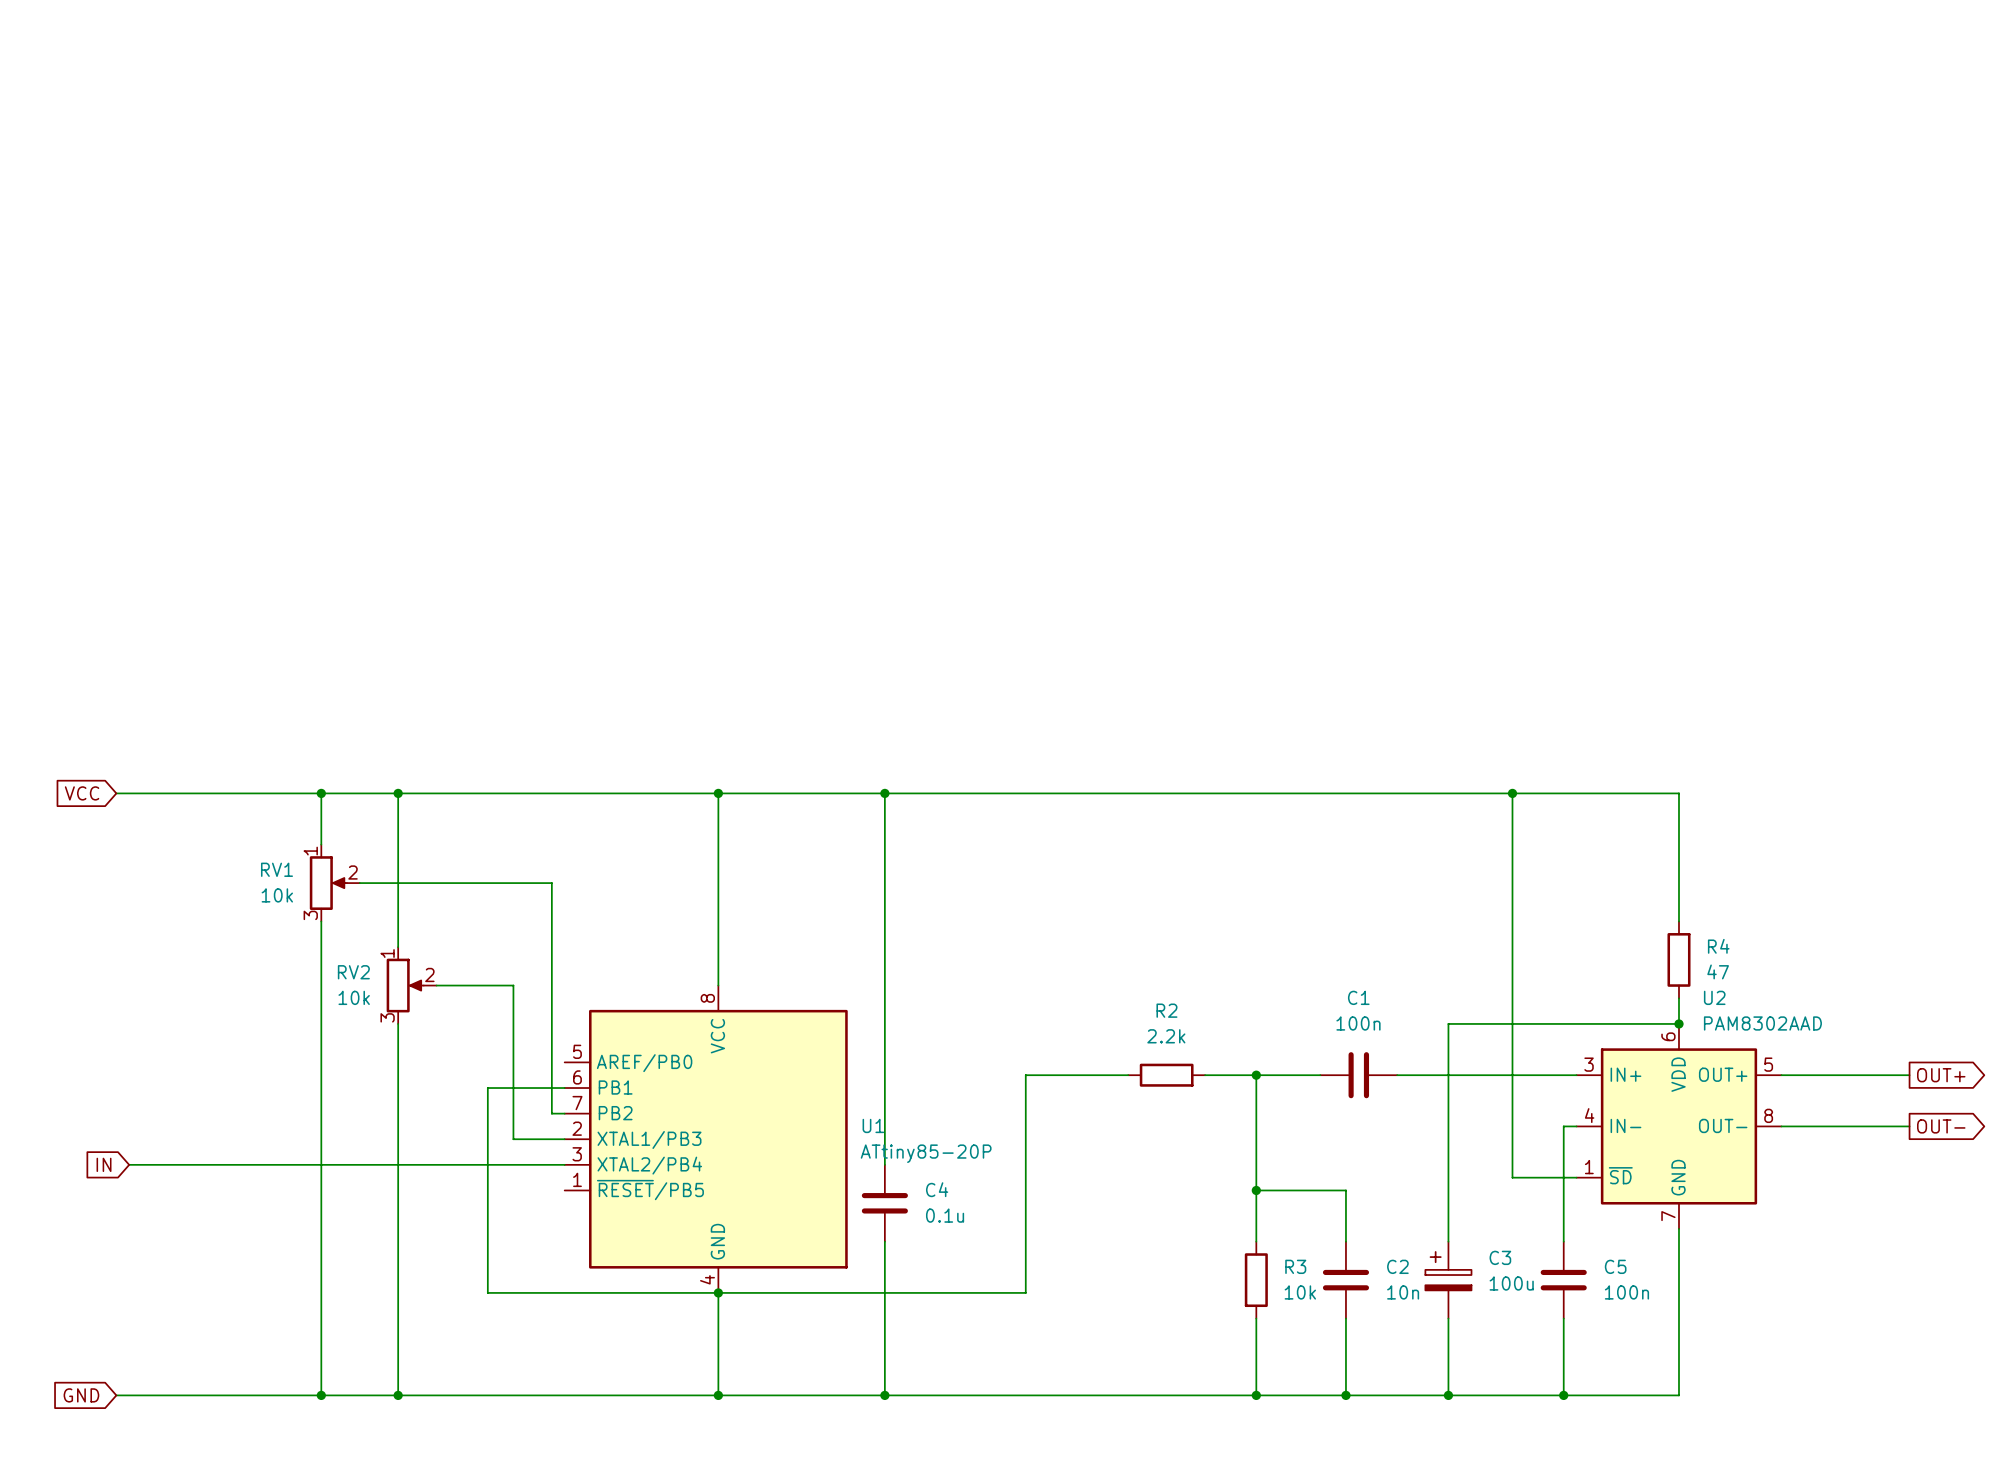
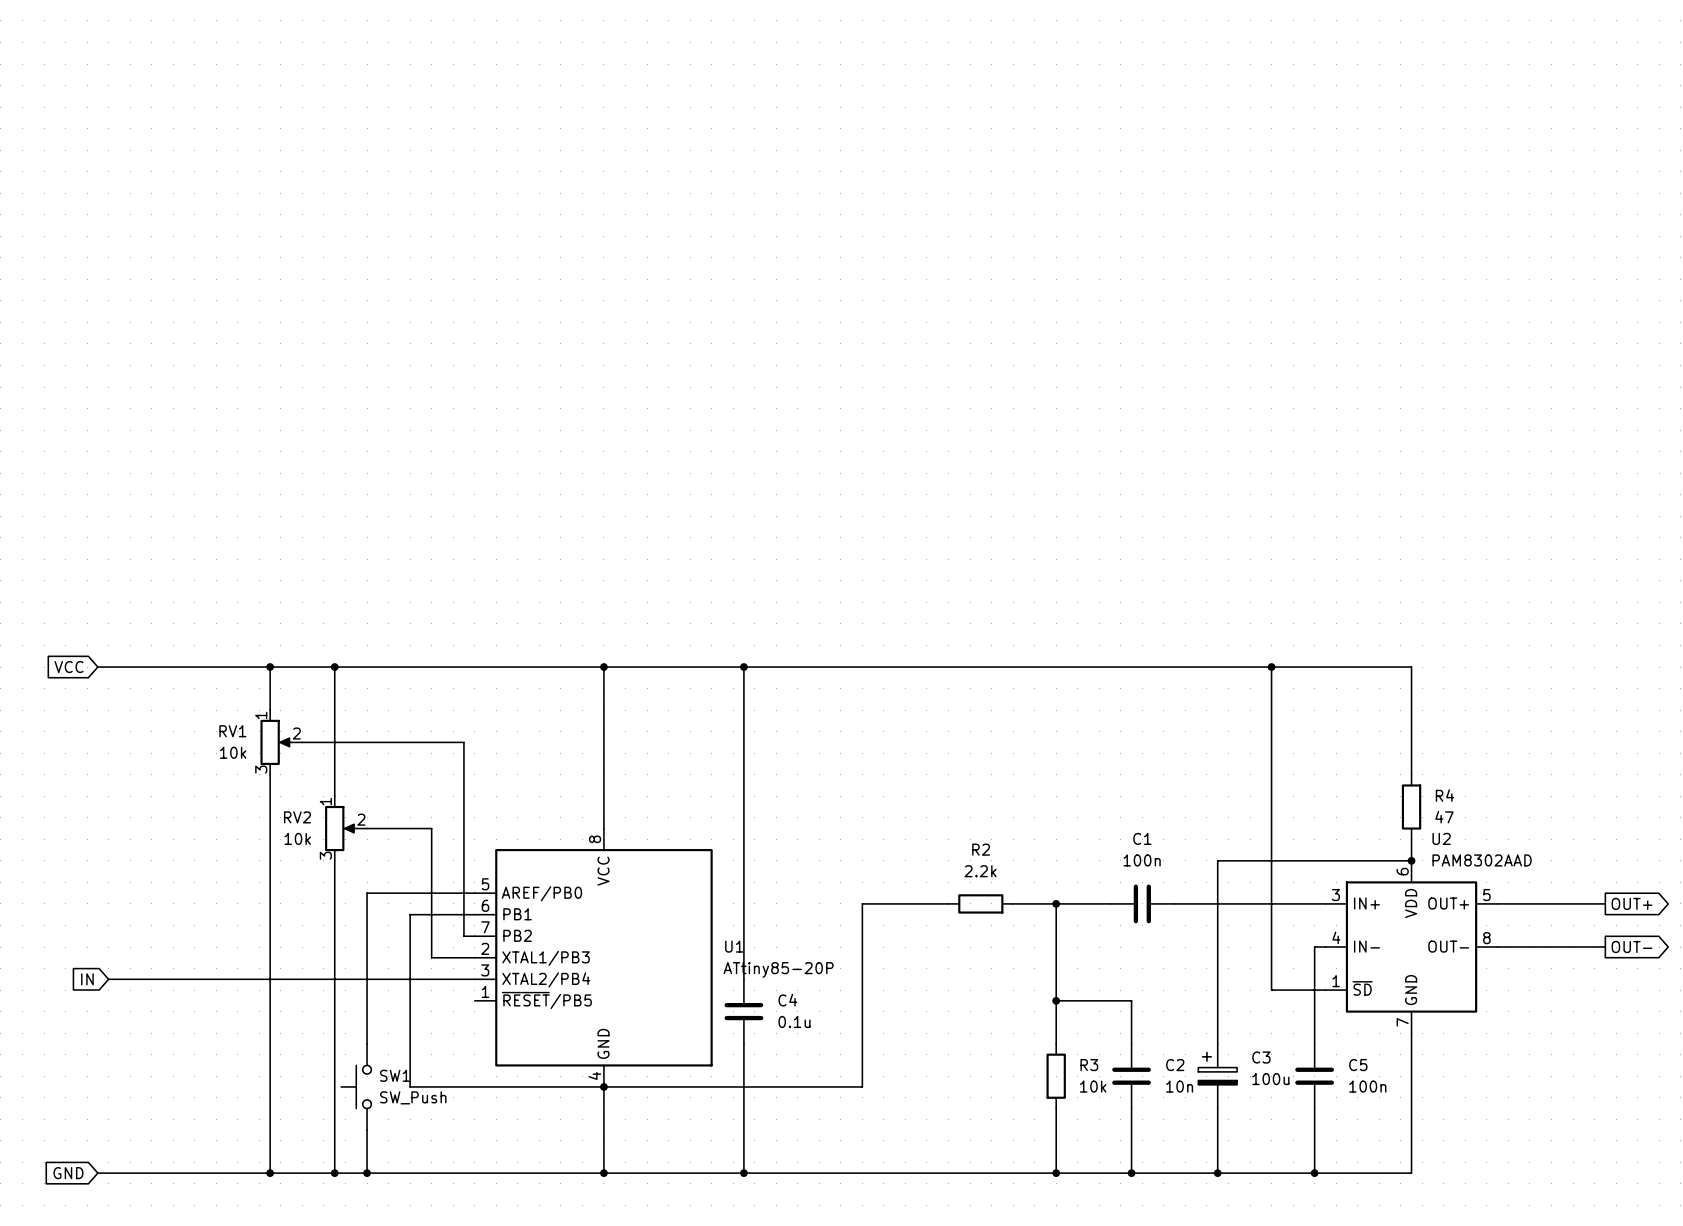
wire: none -> (474, 893) (367, 893) (367, 1043)
SW1: none -> SW_Push (356, 1086)
wire: none -> (367, 1130) (367, 1173)
junction: none -> (367, 1173)

